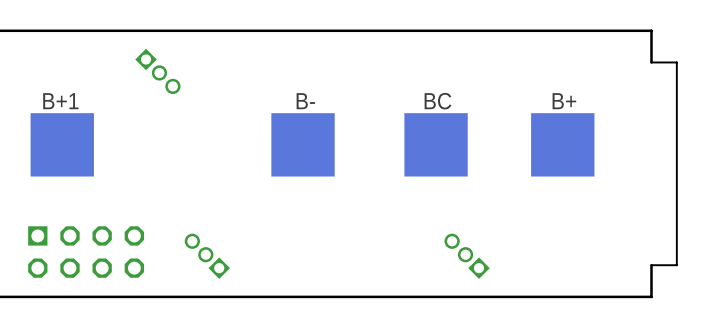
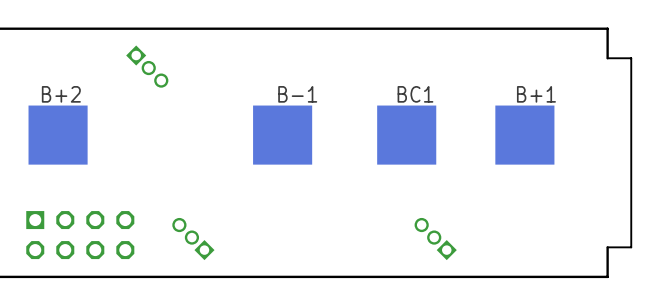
B+1 name: B+1 (60, 101) -> B+2 (61, 94)
B- name: B- (305, 101) -> B-1 (297, 94)
BC name: BC (437, 101) -> BC1 (415, 94)
B+ name: B+ (564, 101) -> B+1 (536, 94)

